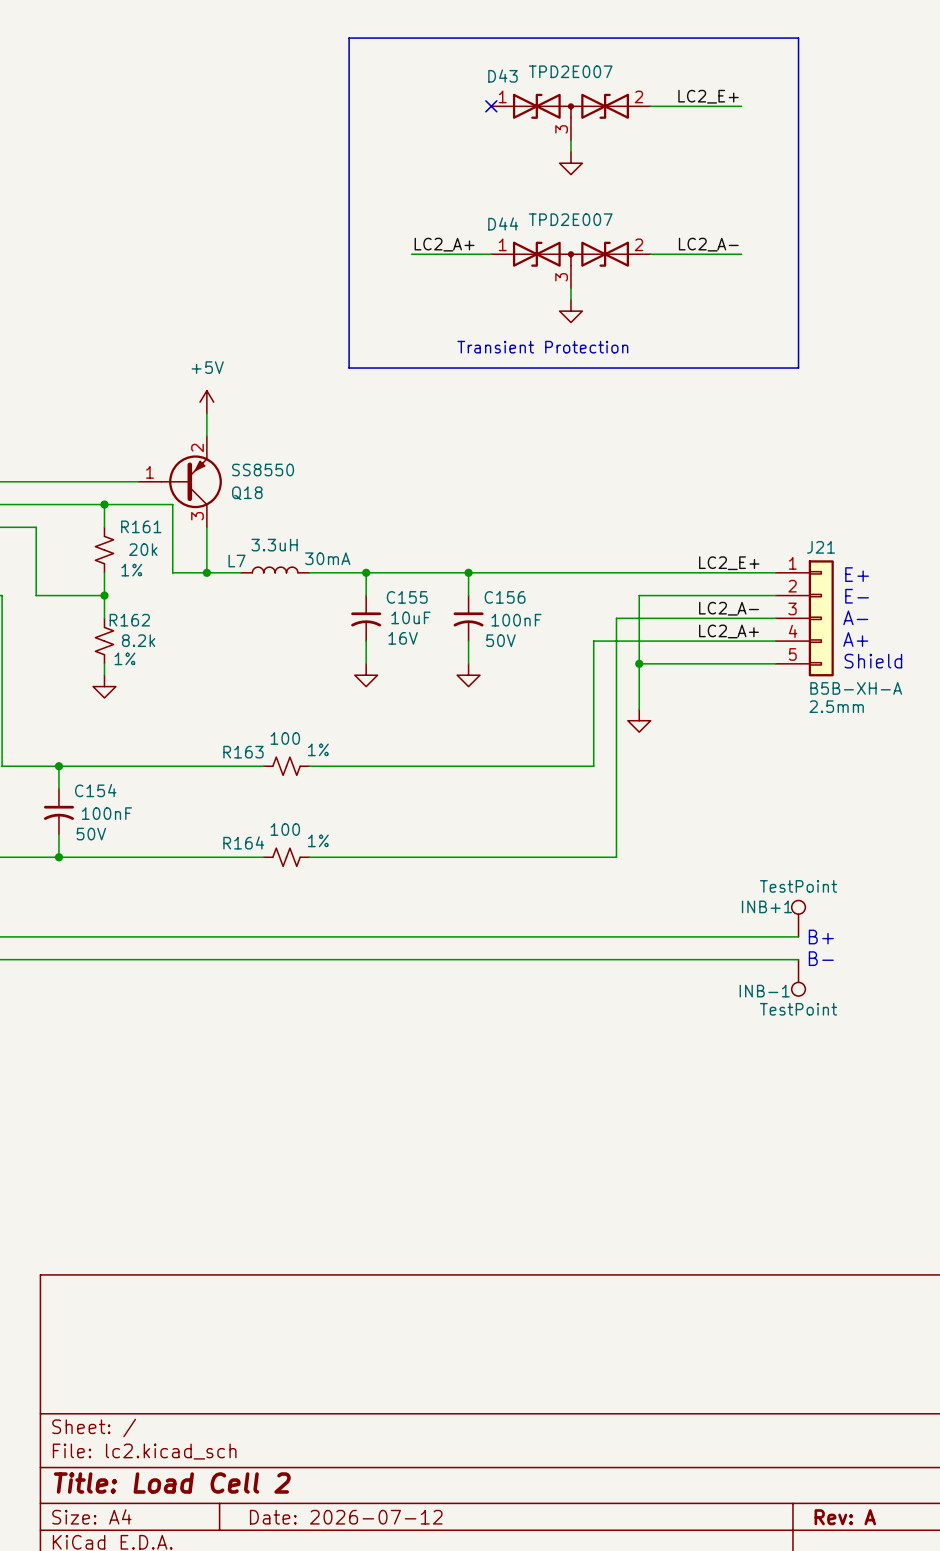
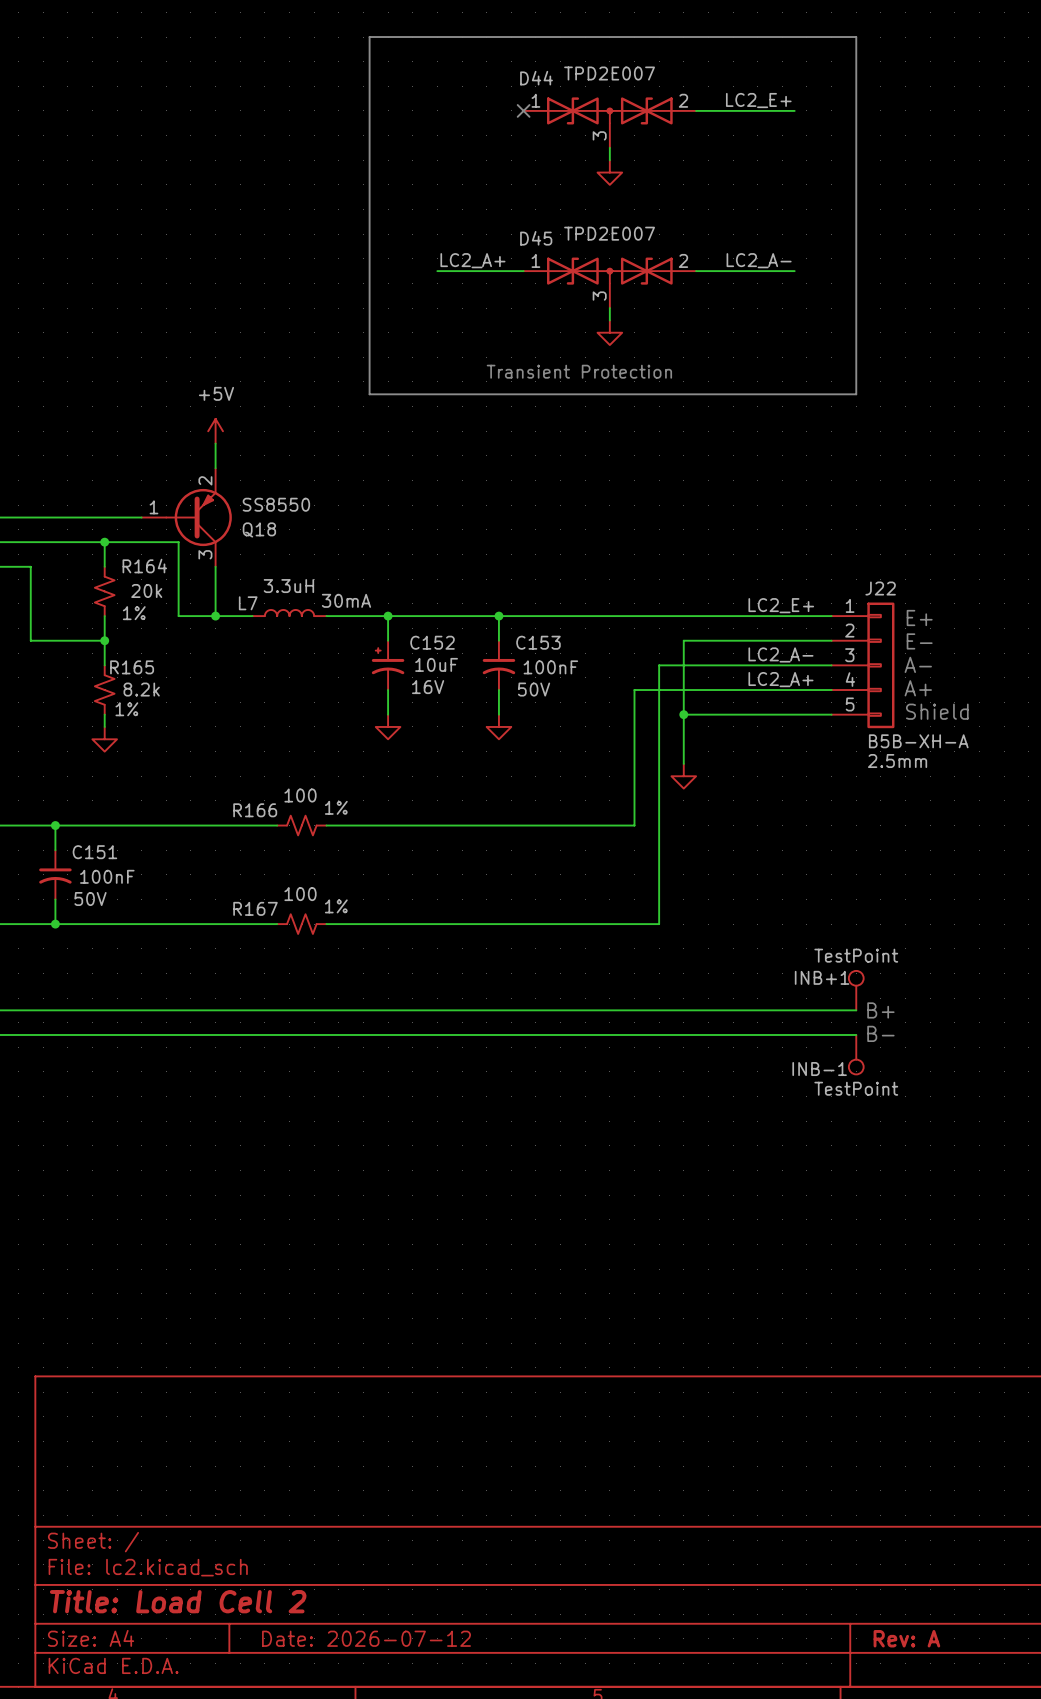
D43 name: D43 (502, 76) -> D44 (536, 78)
D44 name: D44 (503, 223) -> D45 (536, 238)
R161 name: R161 (141, 526) -> R164 (144, 566)
J21 name: J21 (821, 547) -> J22 (880, 588)
C156 name: C156 (505, 597) -> C153 (538, 642)
C155: 10uF (366, 618) -> none
C152: none -> 10uF (388, 665)
R162 name: R162 (129, 620) -> R165 (132, 667)
R163 name: R163 (243, 752) -> R166 (255, 810)
C154 name: C154 (95, 790) -> C151 (94, 852)
R164 name: R164 (243, 842) -> R167 (255, 908)

